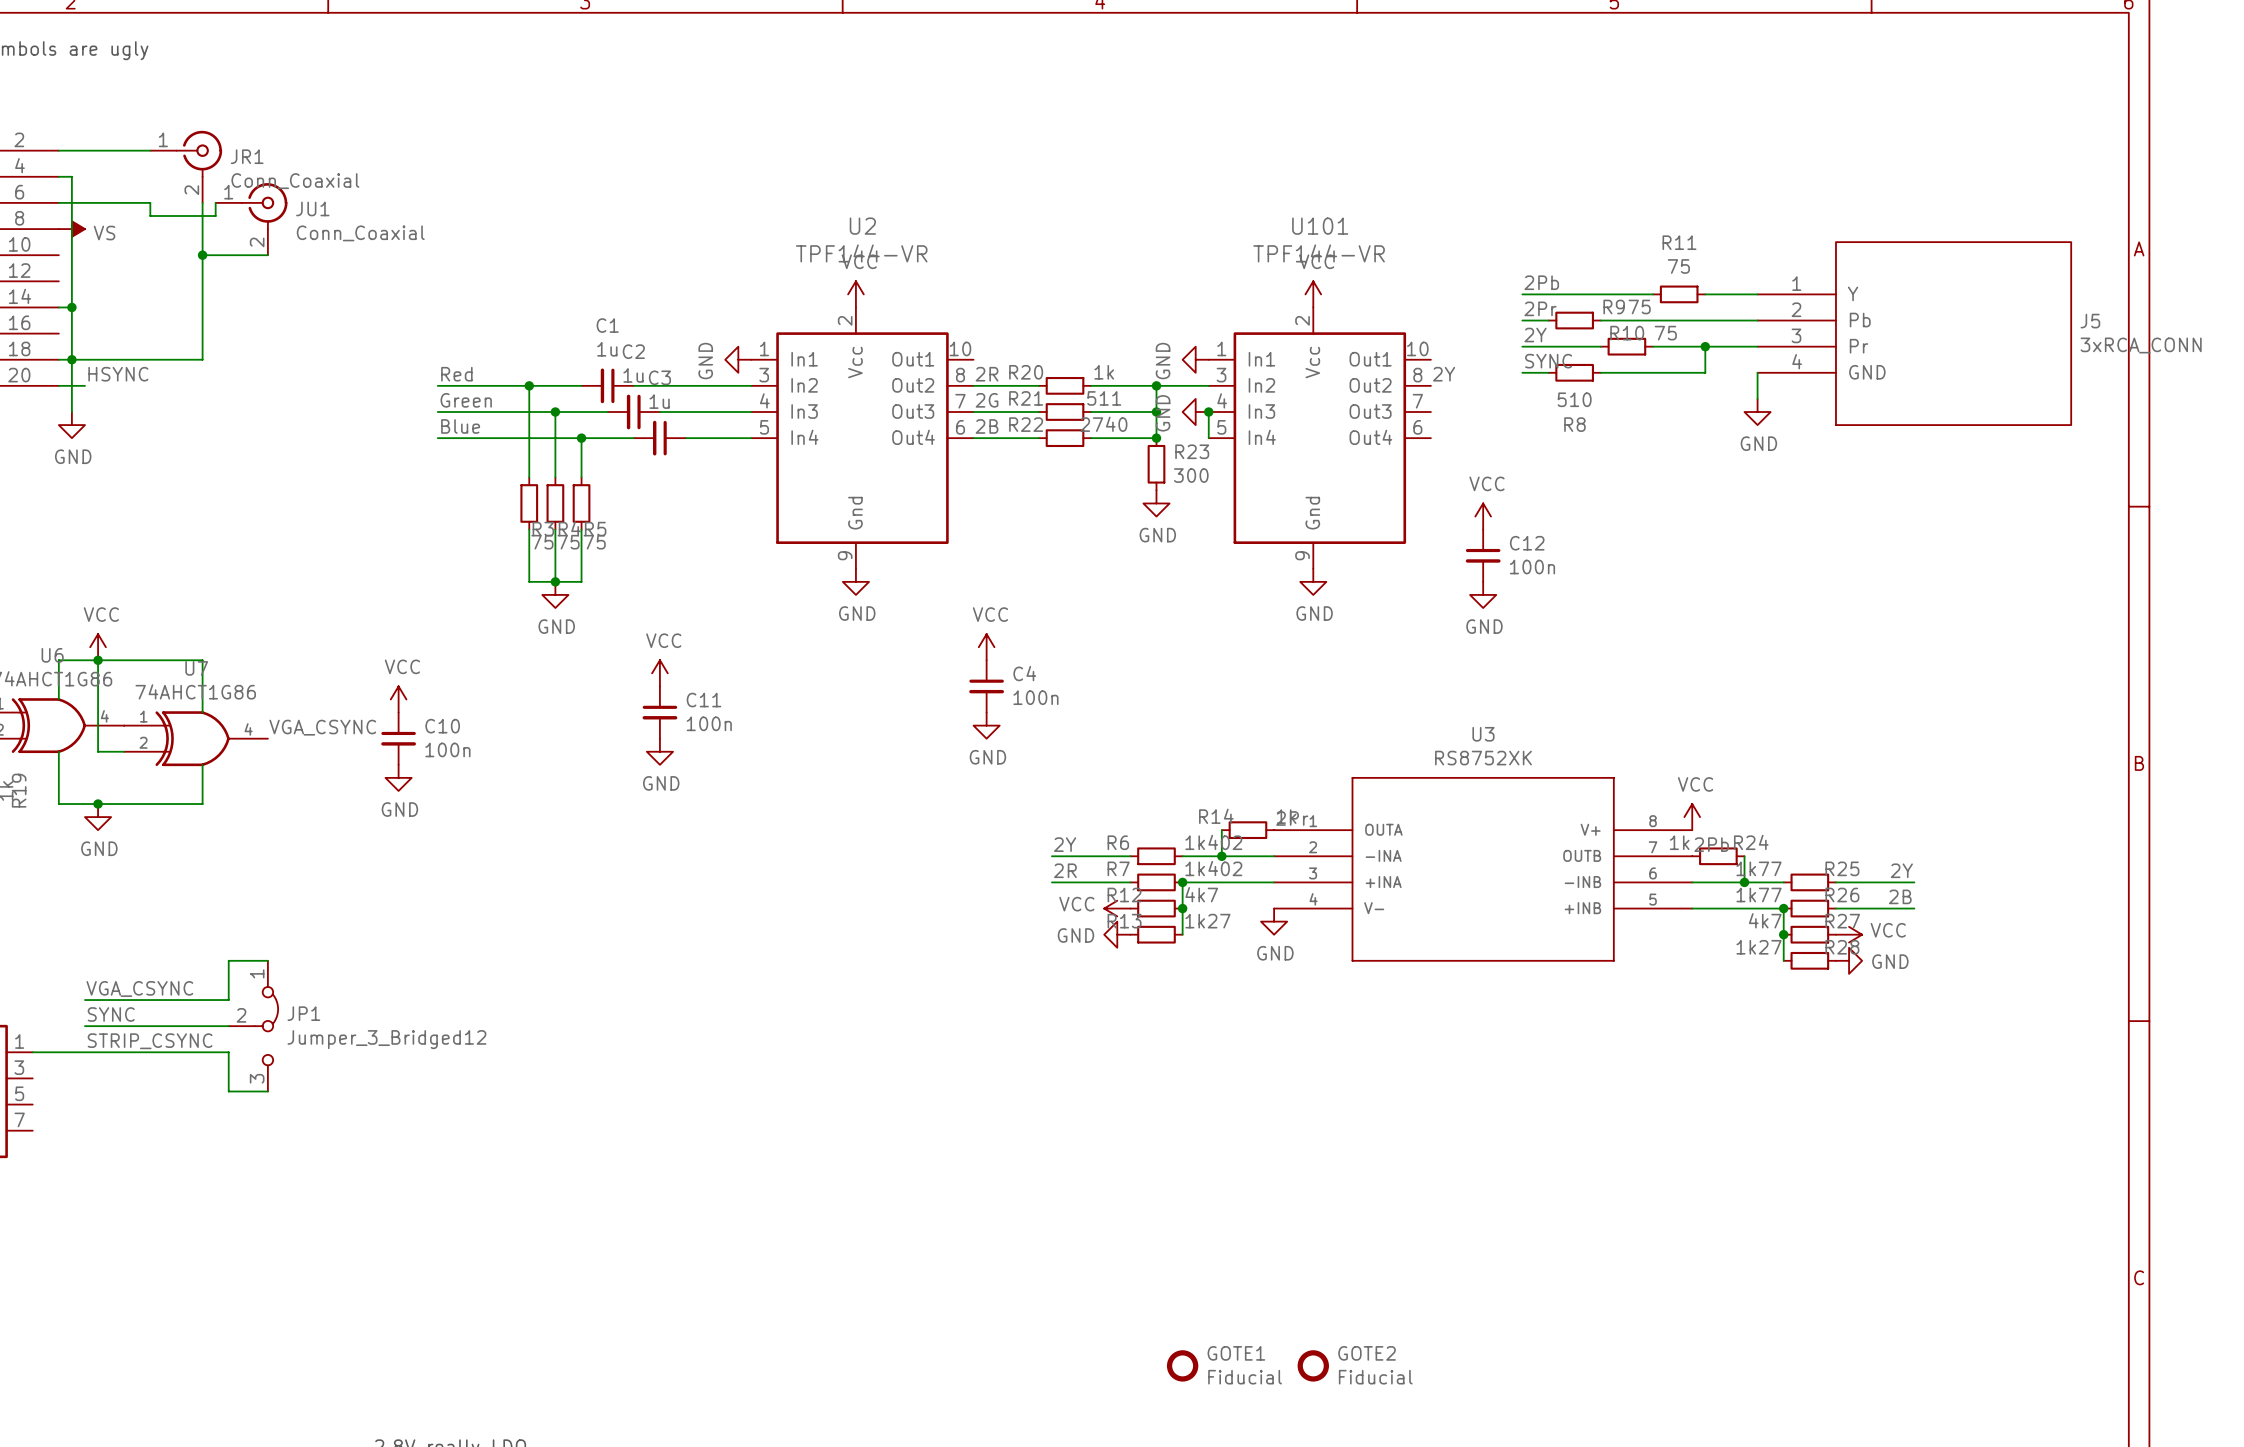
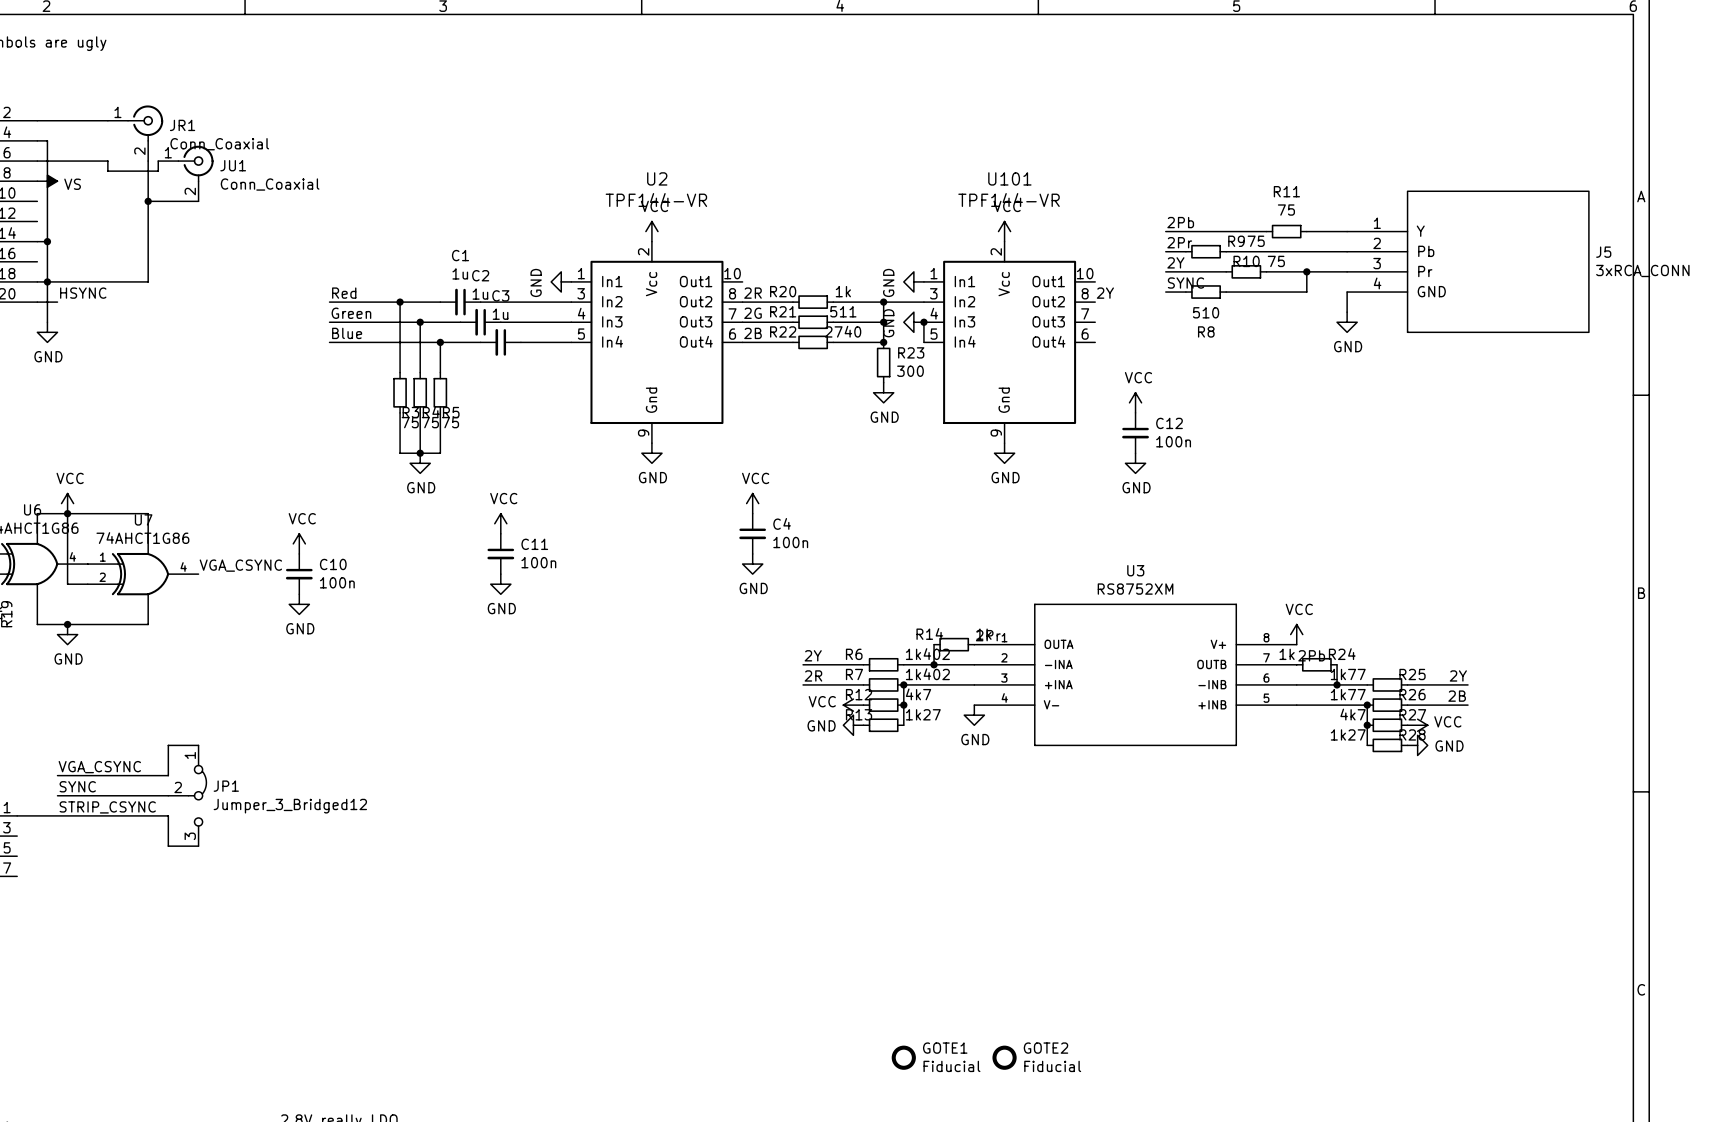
U3 value: RS8752XK (1483, 758) -> RS8752XM (1135, 589)

